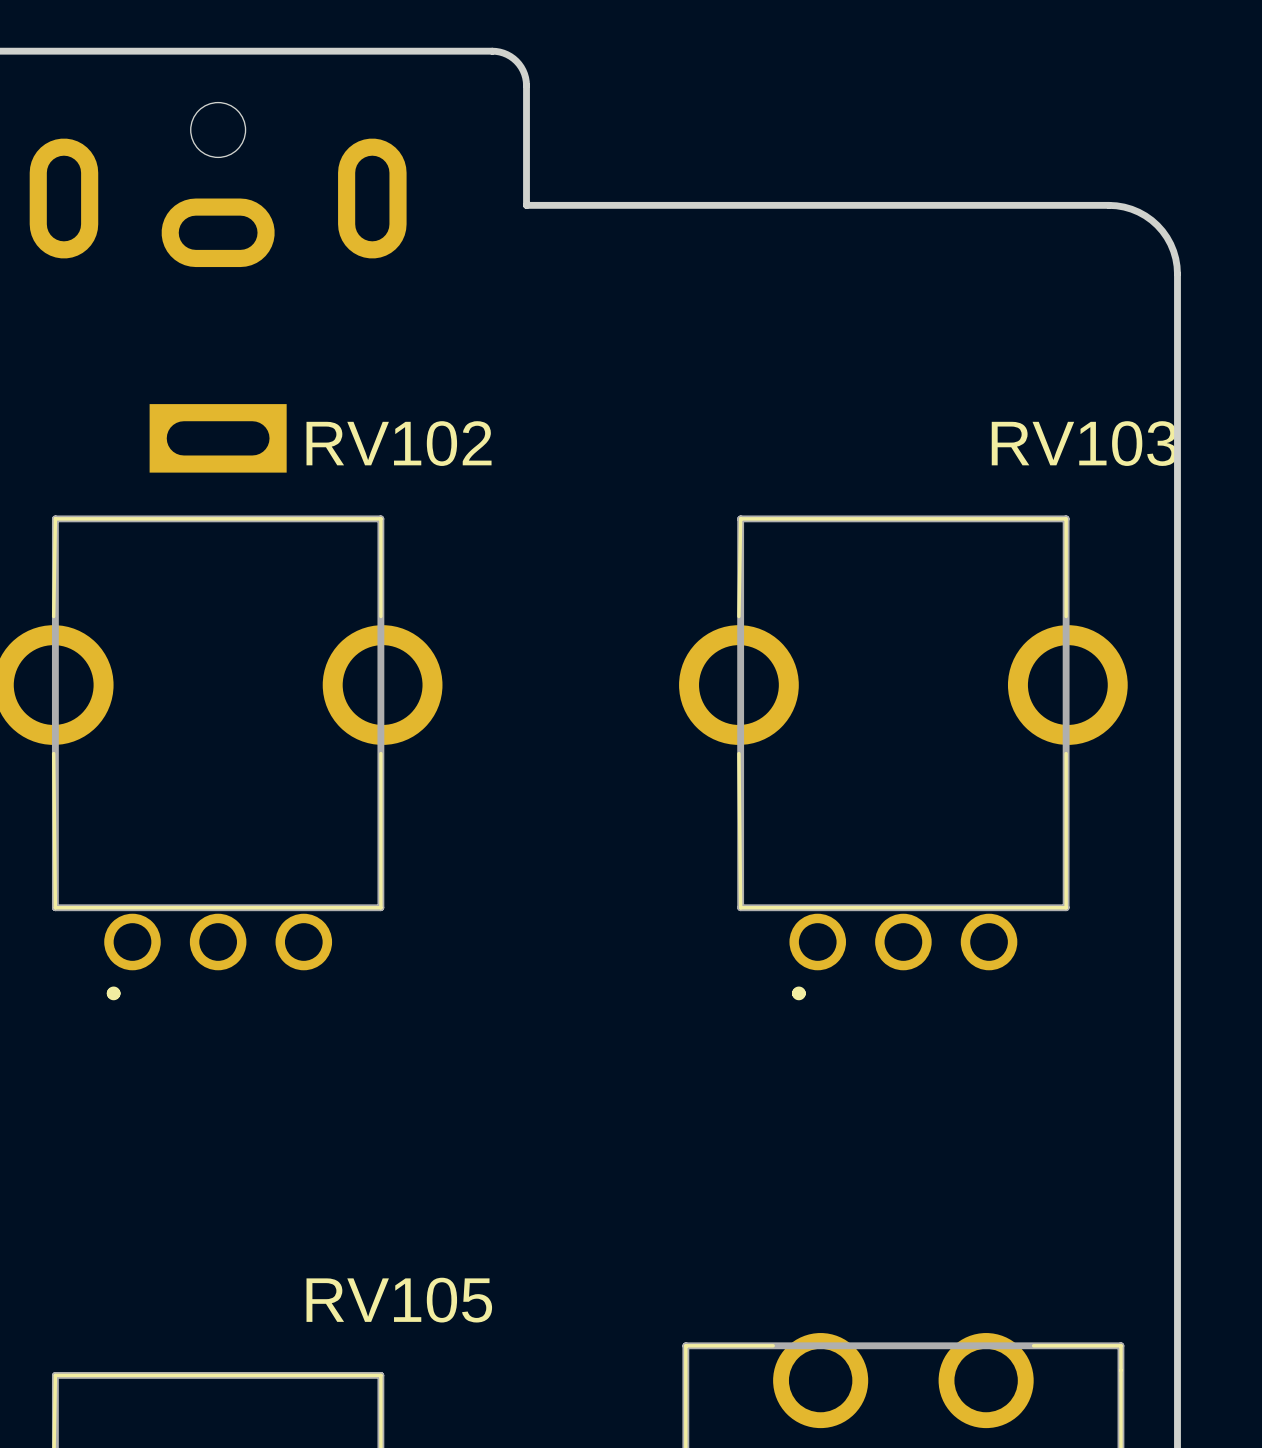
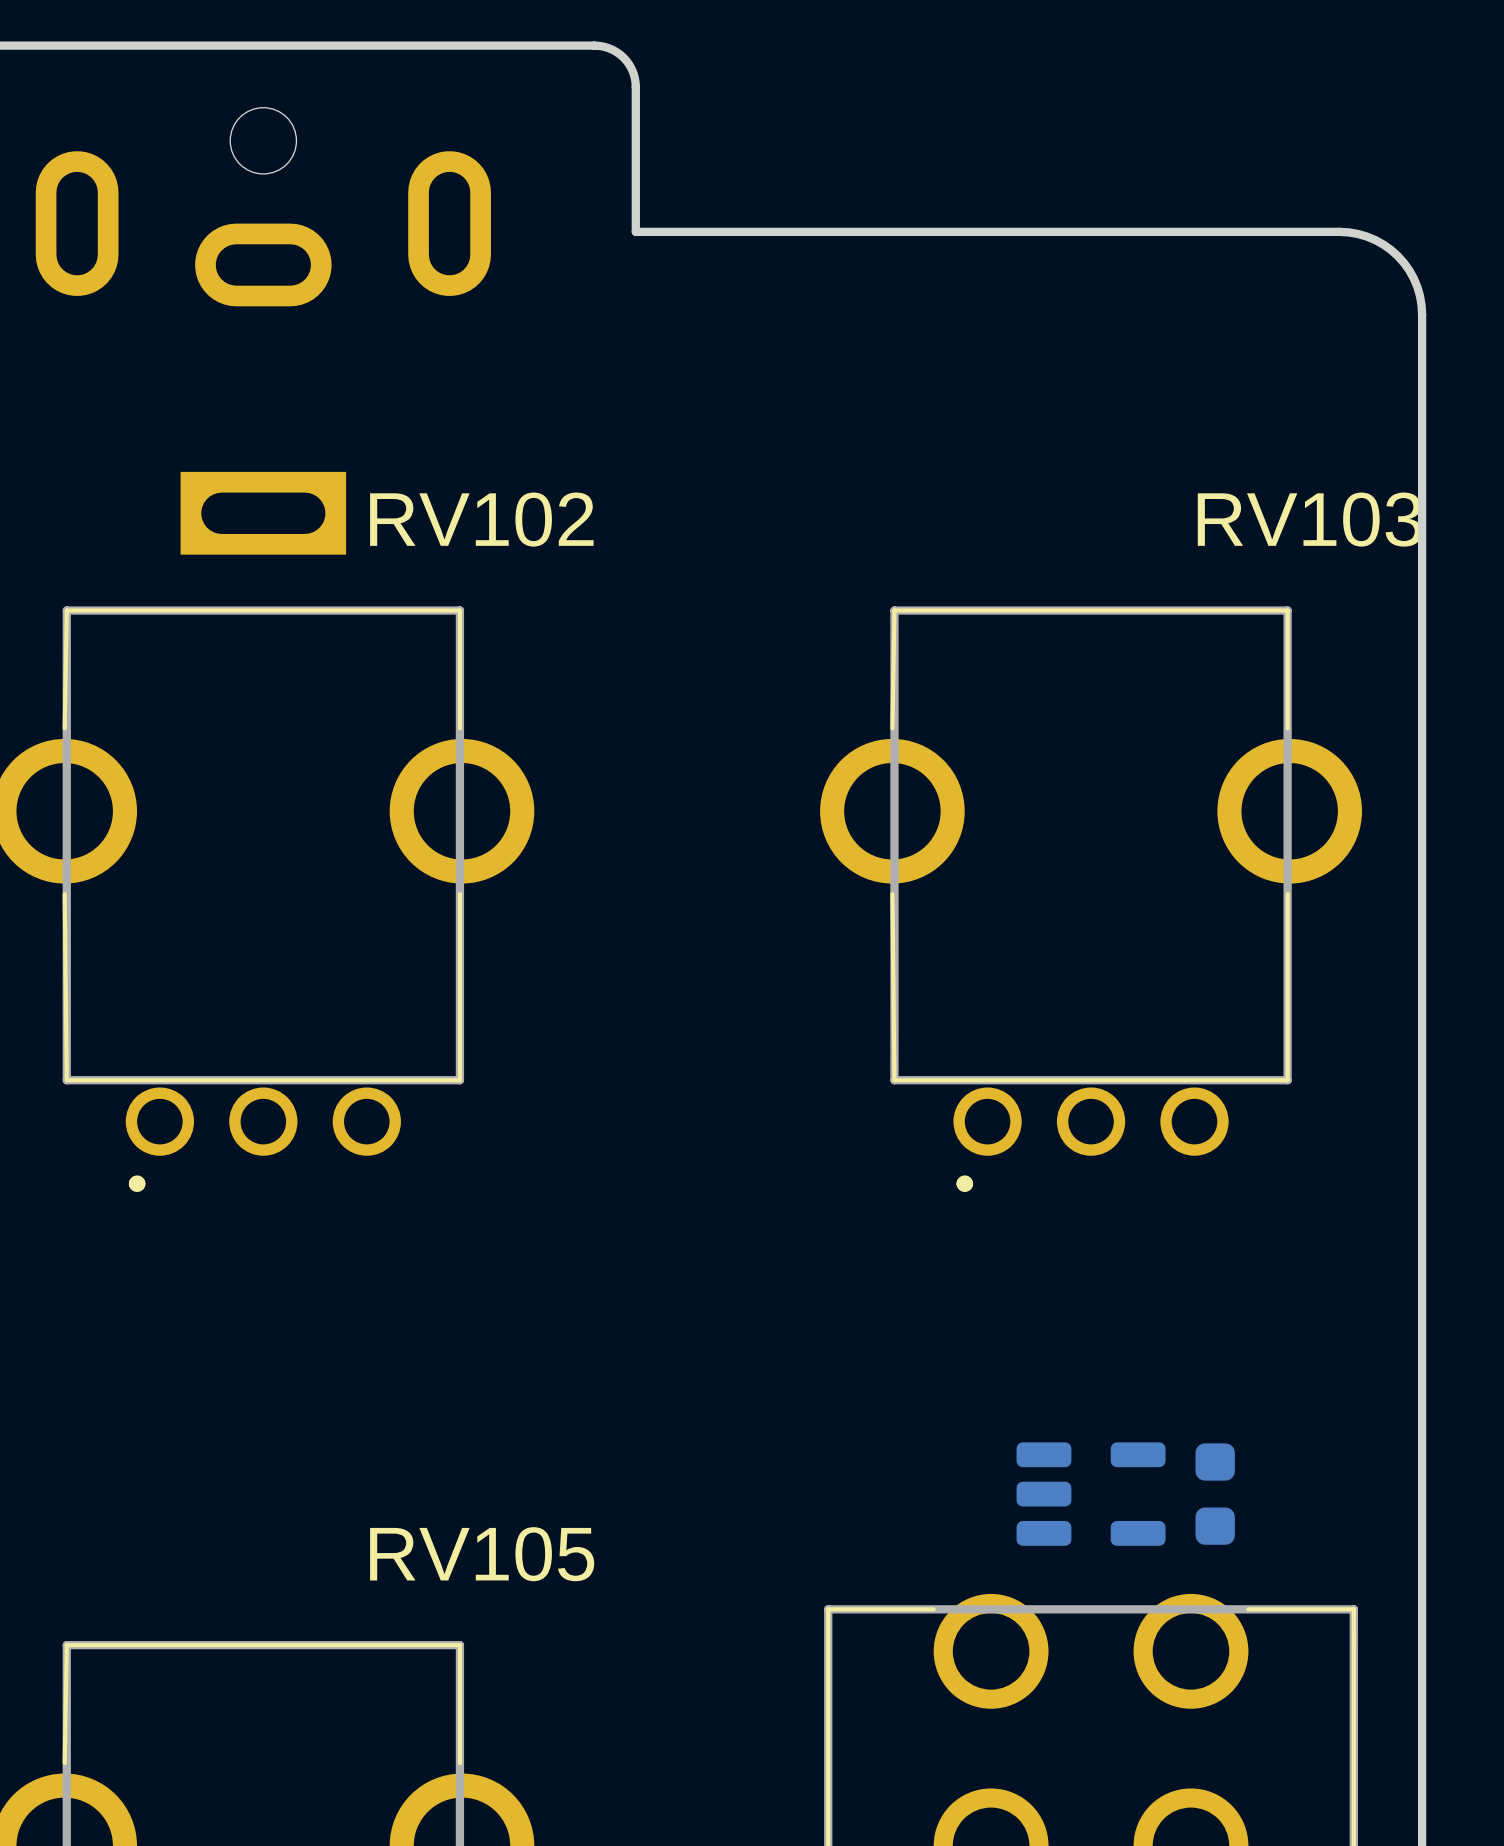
part: none -> (1091, 1494)
part: none -> (1215, 1494)

